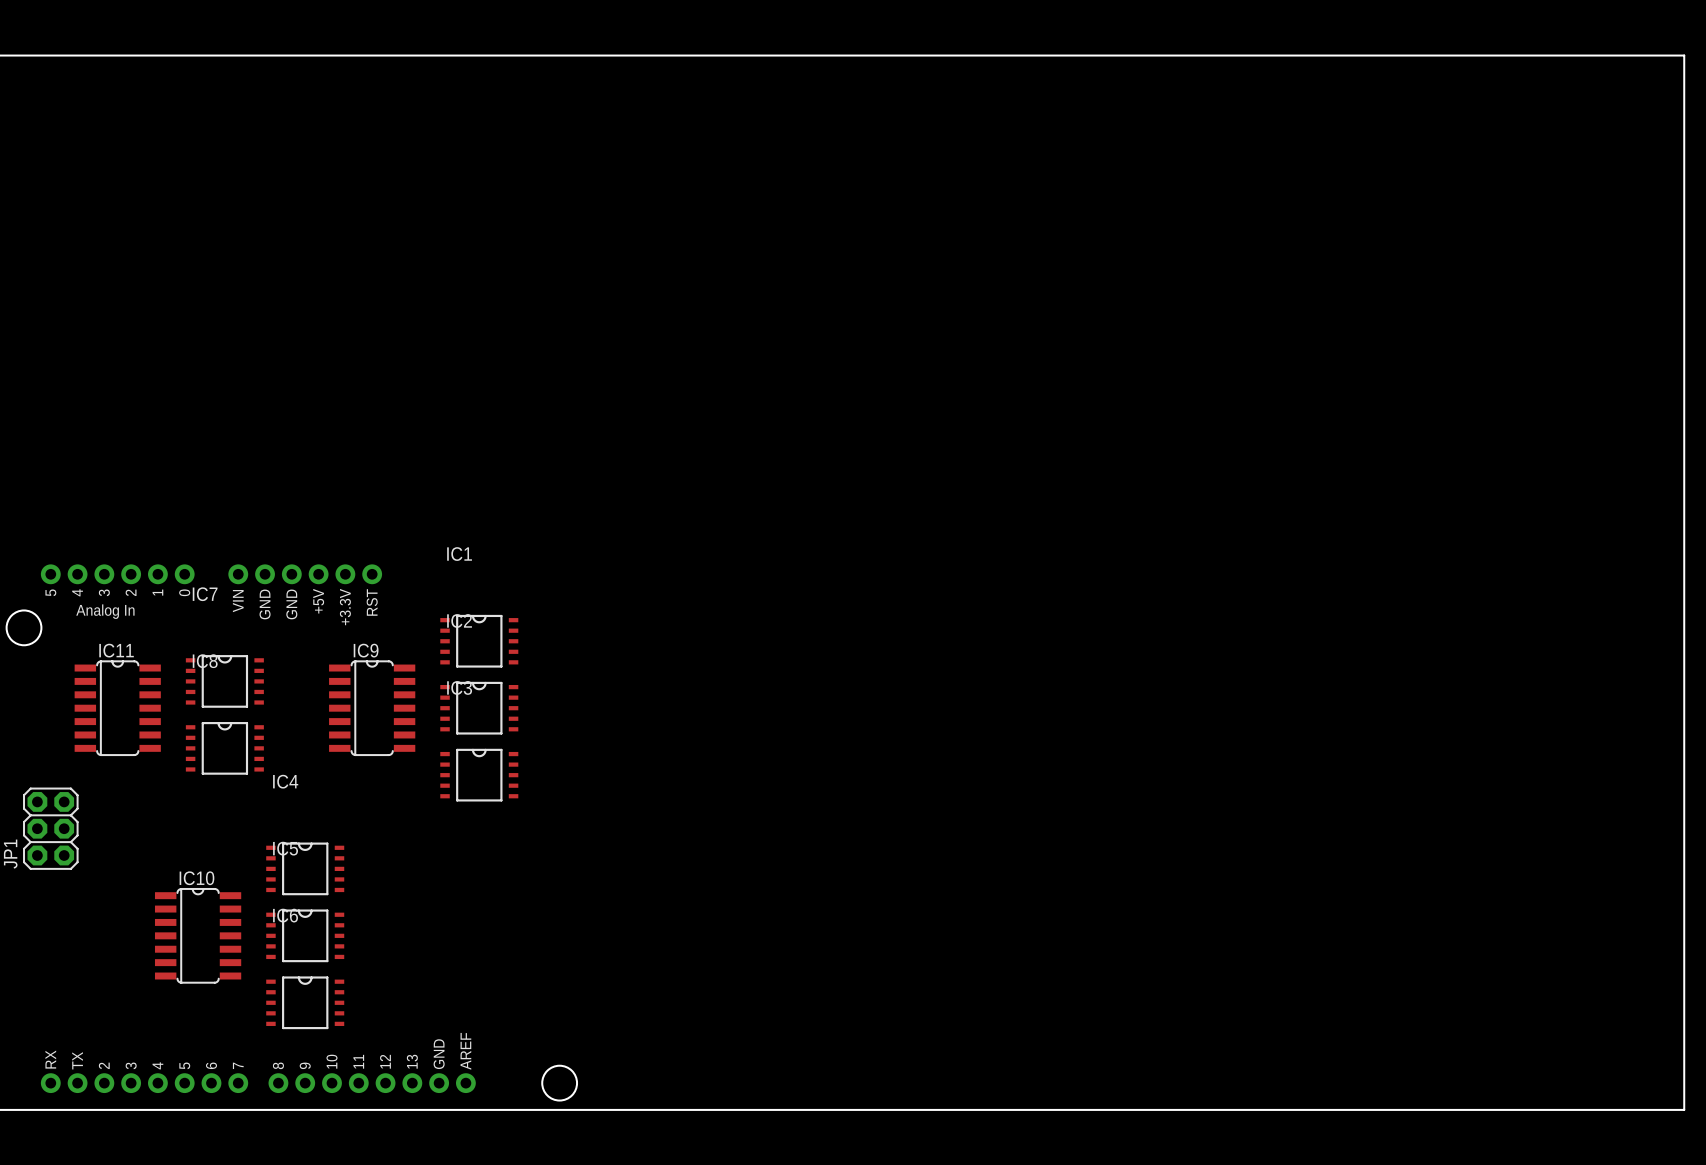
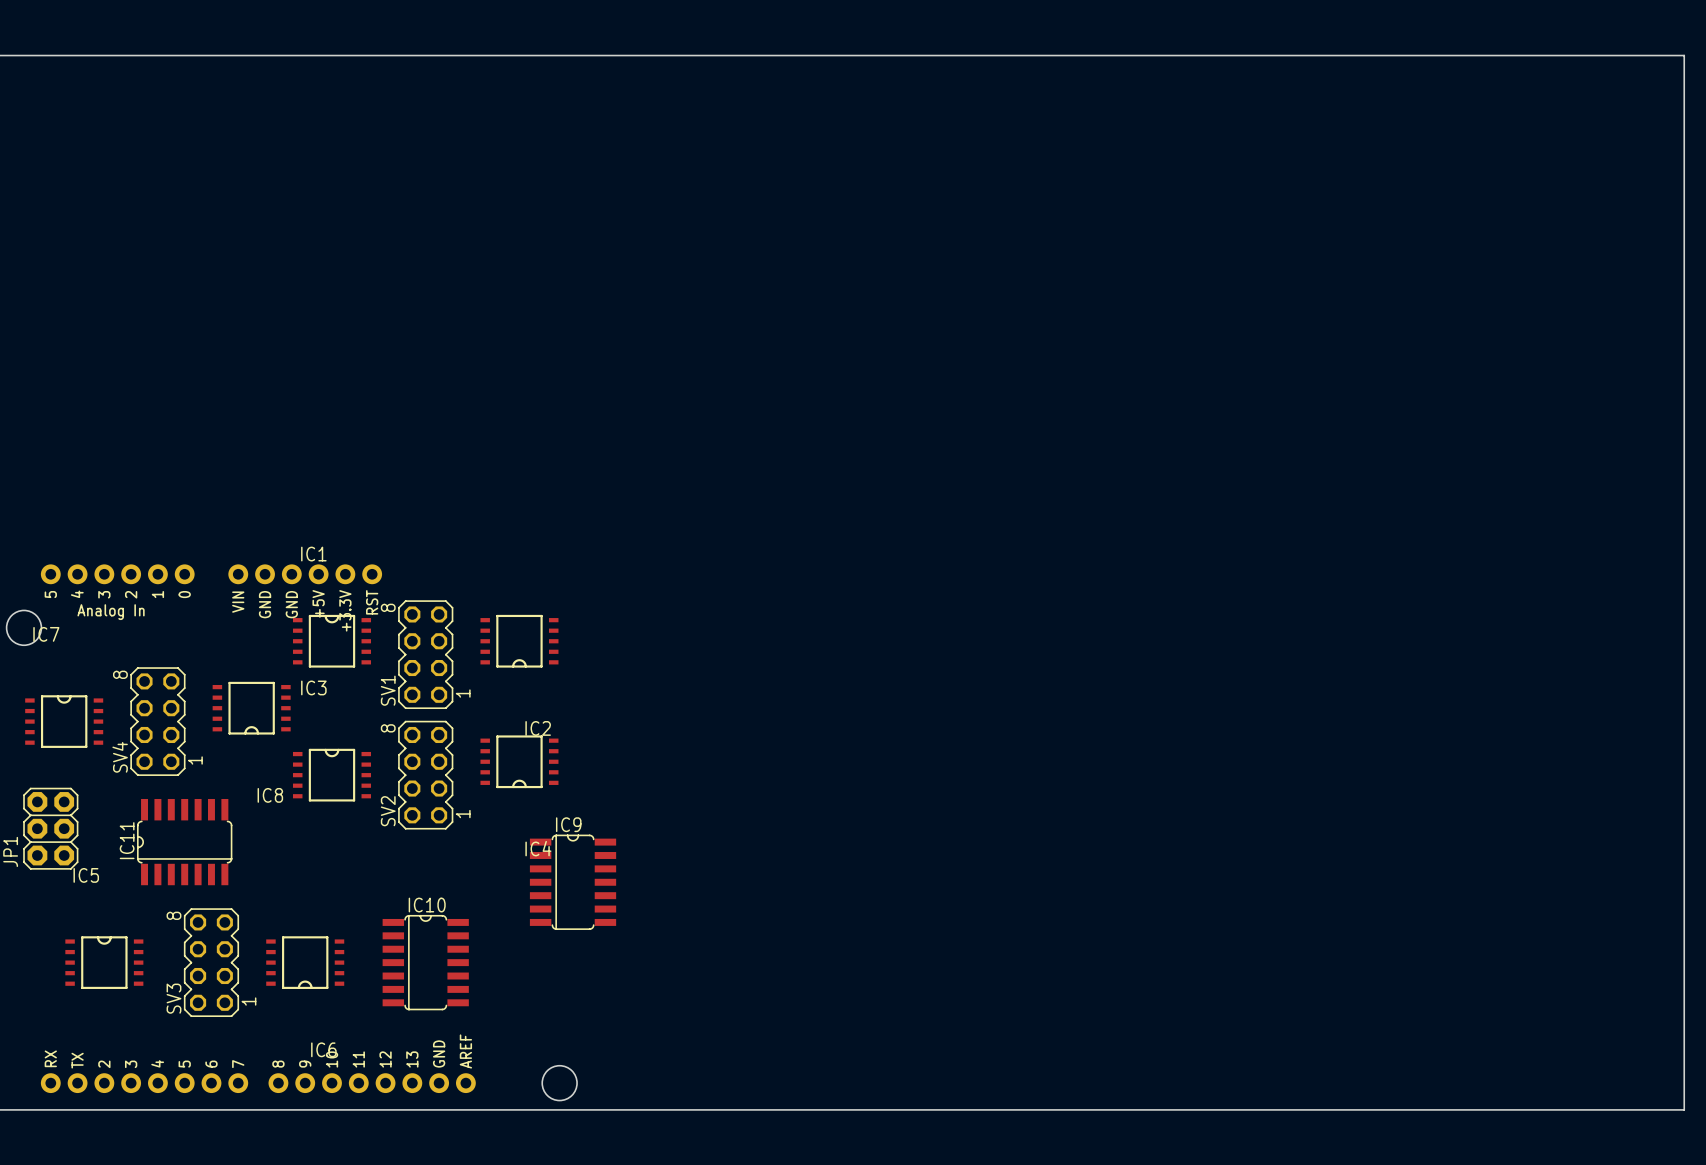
IC1 position: (479, 641) -> (331, 641)
SV1: none -> (425, 654)
IC7 position: (224, 681) -> (64, 721)
IC11 rotation: 0° (117, 708) -> 90° counterclockwise (184, 842)
IC11 position: (117, 708) -> (184, 842)
IC9 position: (372, 708) -> (573, 882)
IC2 rotation: 0° (479, 708) -> 180° (519, 641)
IC2 position: (479, 708) -> (519, 641)
SV4: none -> (157, 721)
IC8 rotation: 0° (224, 748) -> 180° (251, 708)
IC8 position: (224, 748) -> (251, 708)
SV2: none -> (425, 775)
IC3 position: (479, 775) -> (331, 775)
IC4 rotation: 0° (305, 868) -> 180° (519, 761)
IC4 position: (305, 868) -> (519, 761)
IC10 position: (198, 935) -> (425, 962)
IC5 position: (305, 935) -> (104, 962)
SV3: none -> (211, 962)
IC6 rotation: 0° (305, 1002) -> 180° (305, 962)

